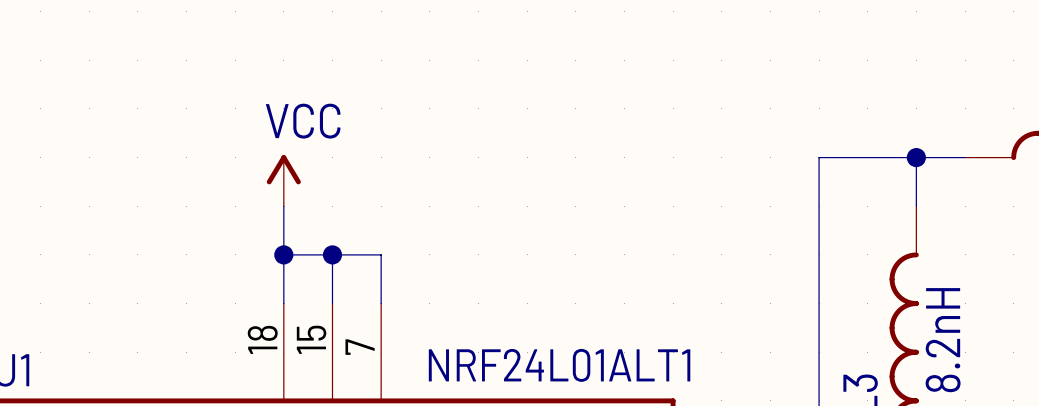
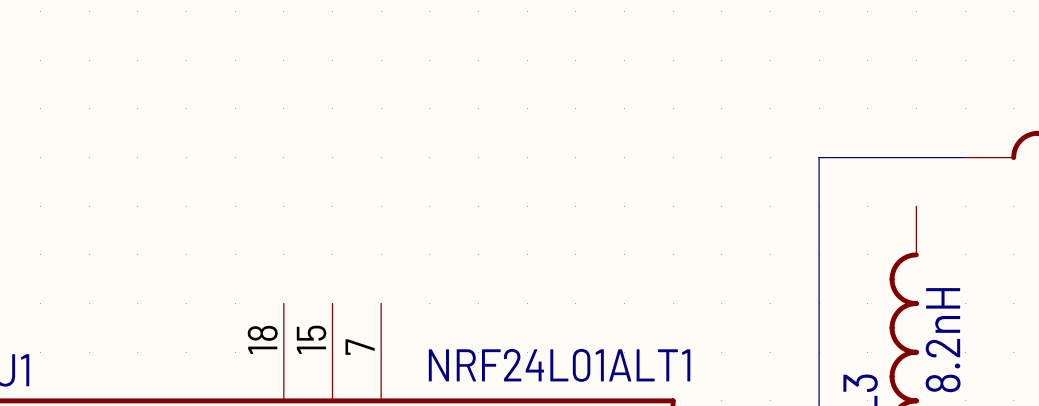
wire: (916, 157) (916, 206) -> none
junction: (916, 157) -> none
power symbol: VCC (283, 180) -> none
wire: (283, 206) (283, 303) -> none
wire: (283, 254) (381, 254) (381, 303) -> none
junction: (283, 254) -> none
wire: (332, 254) (332, 303) -> none
junction: (332, 254) -> none

